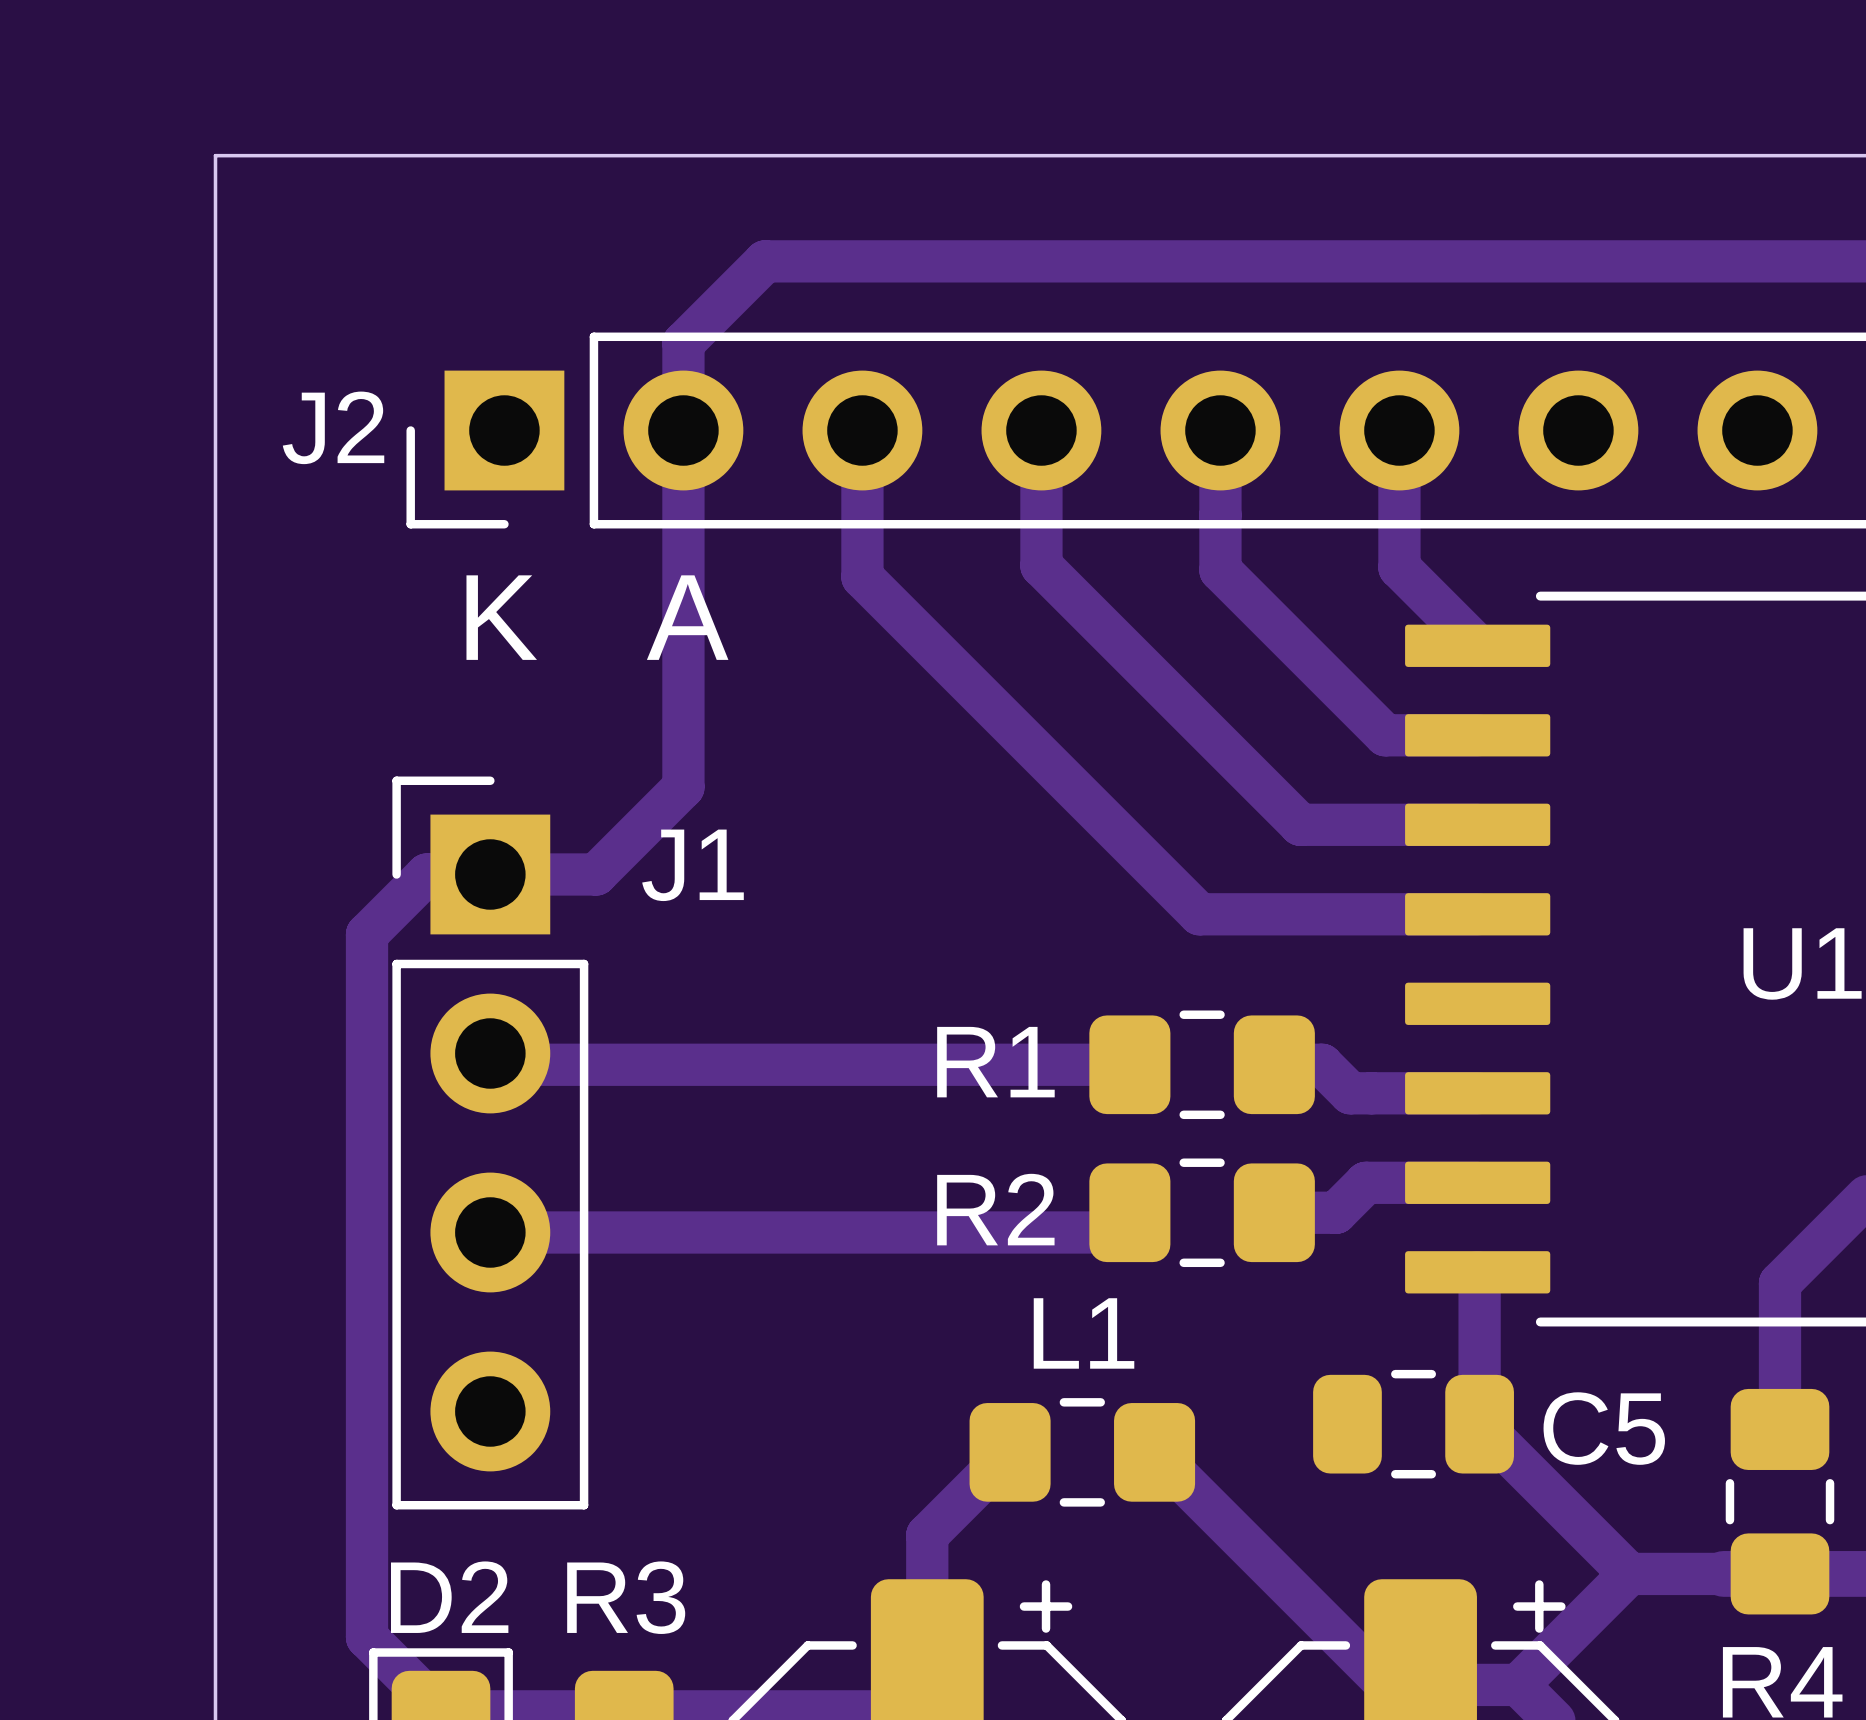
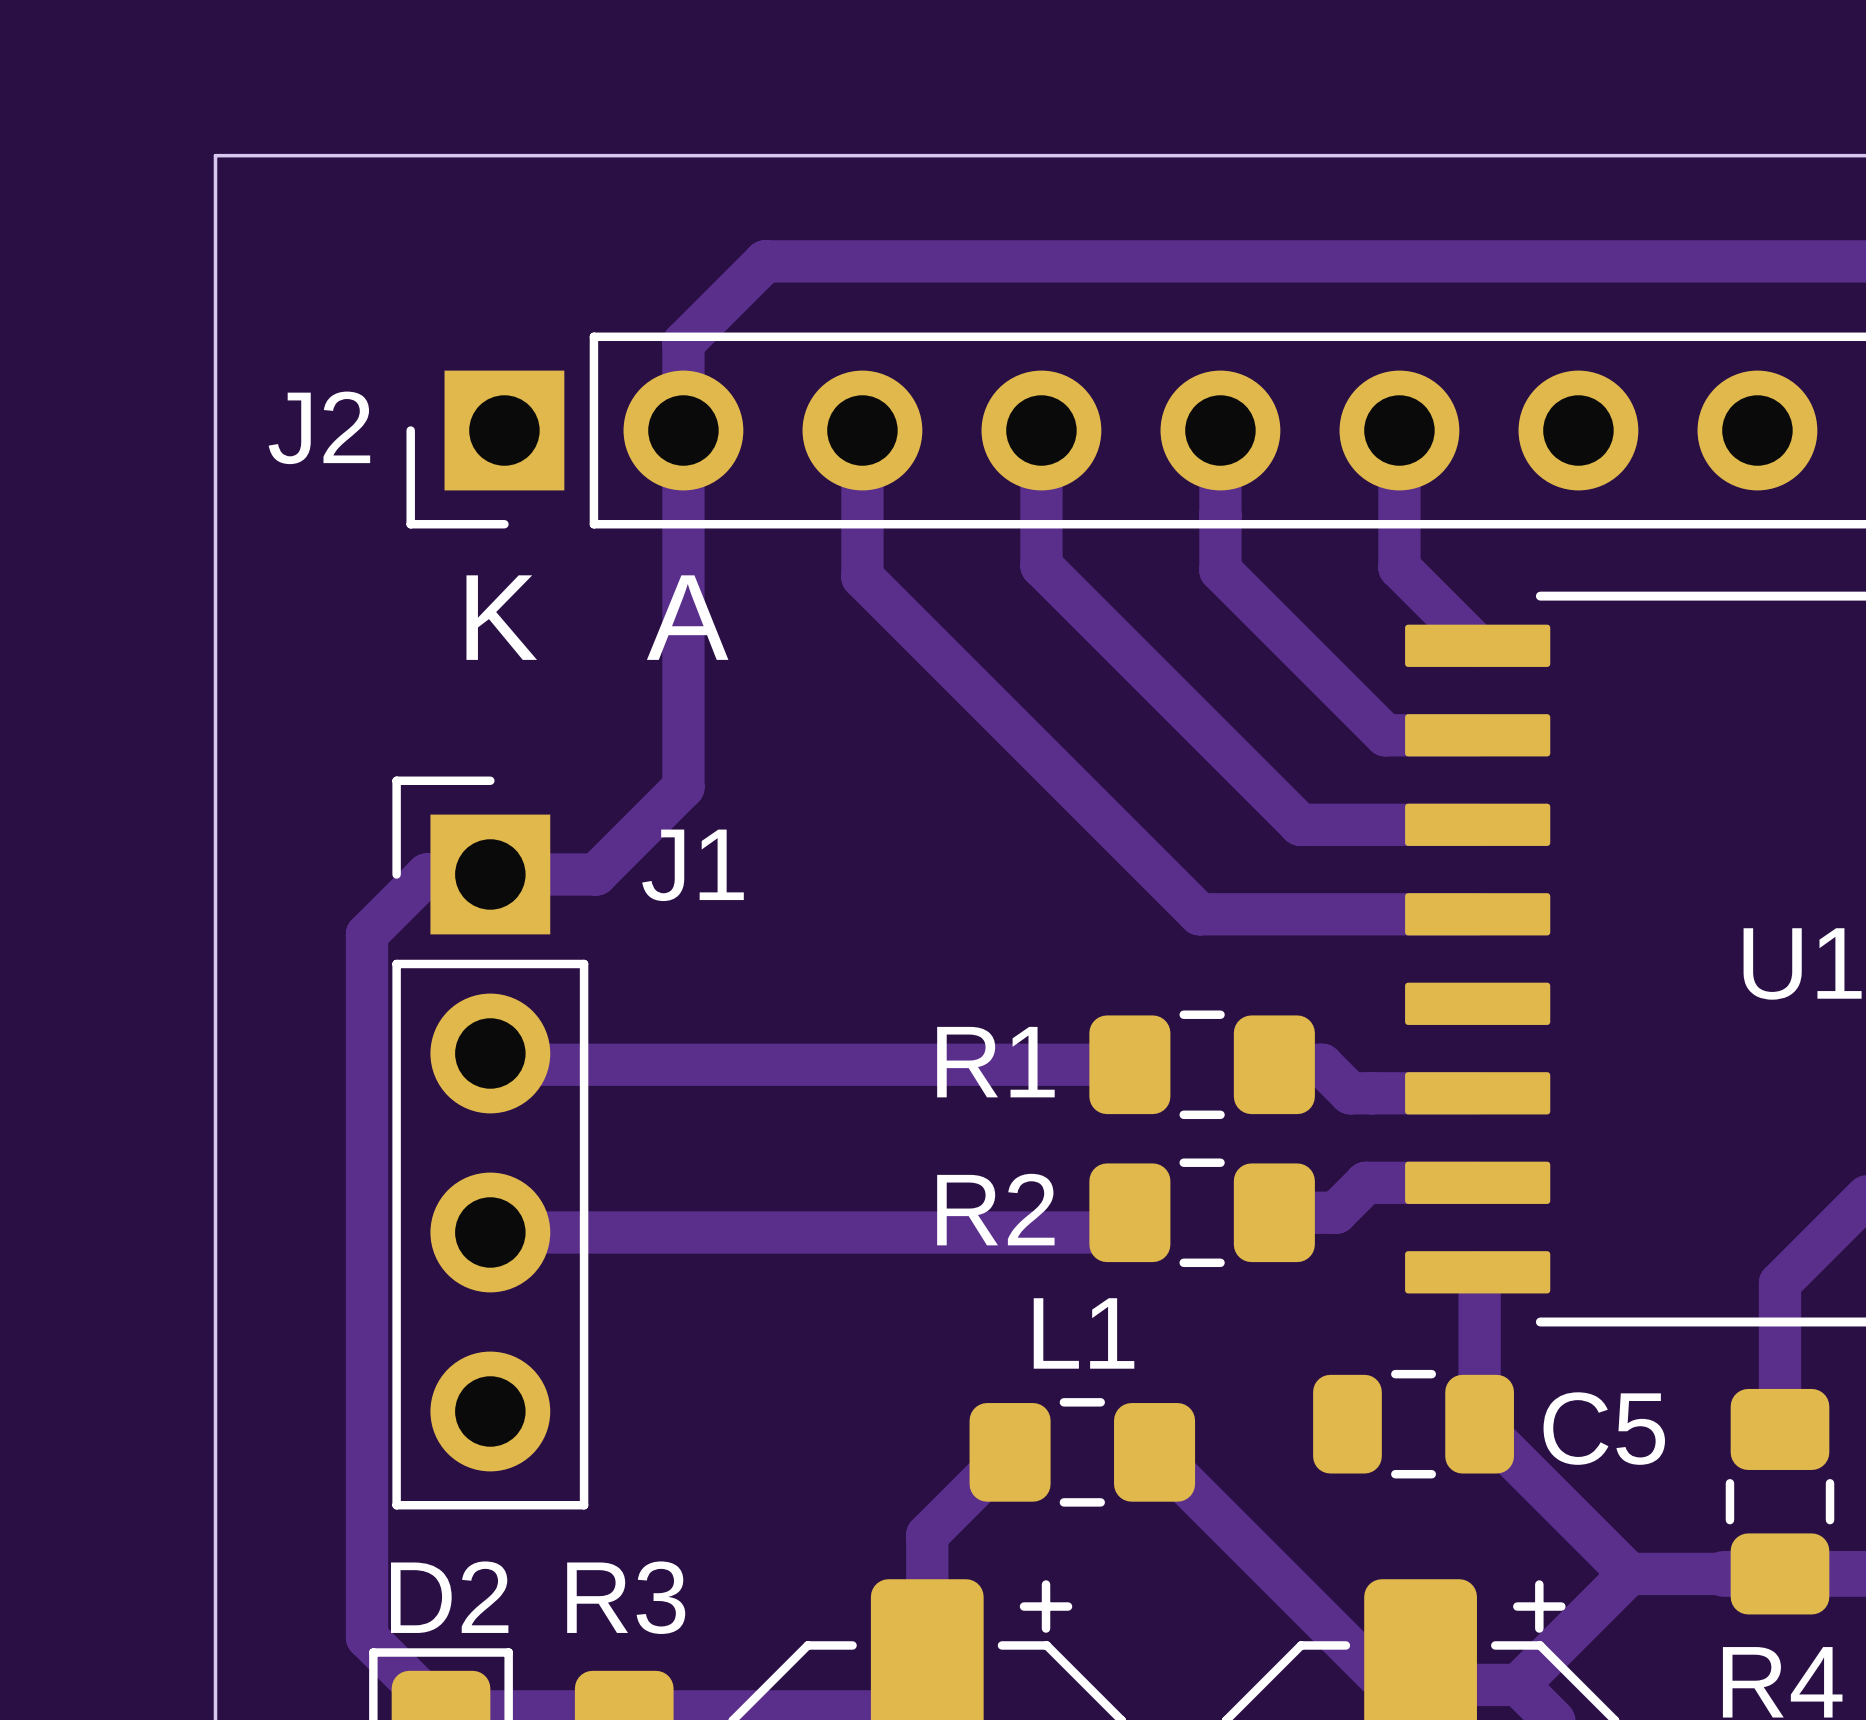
J2 name position: J2 (333, 427) -> J2 (319, 427)

